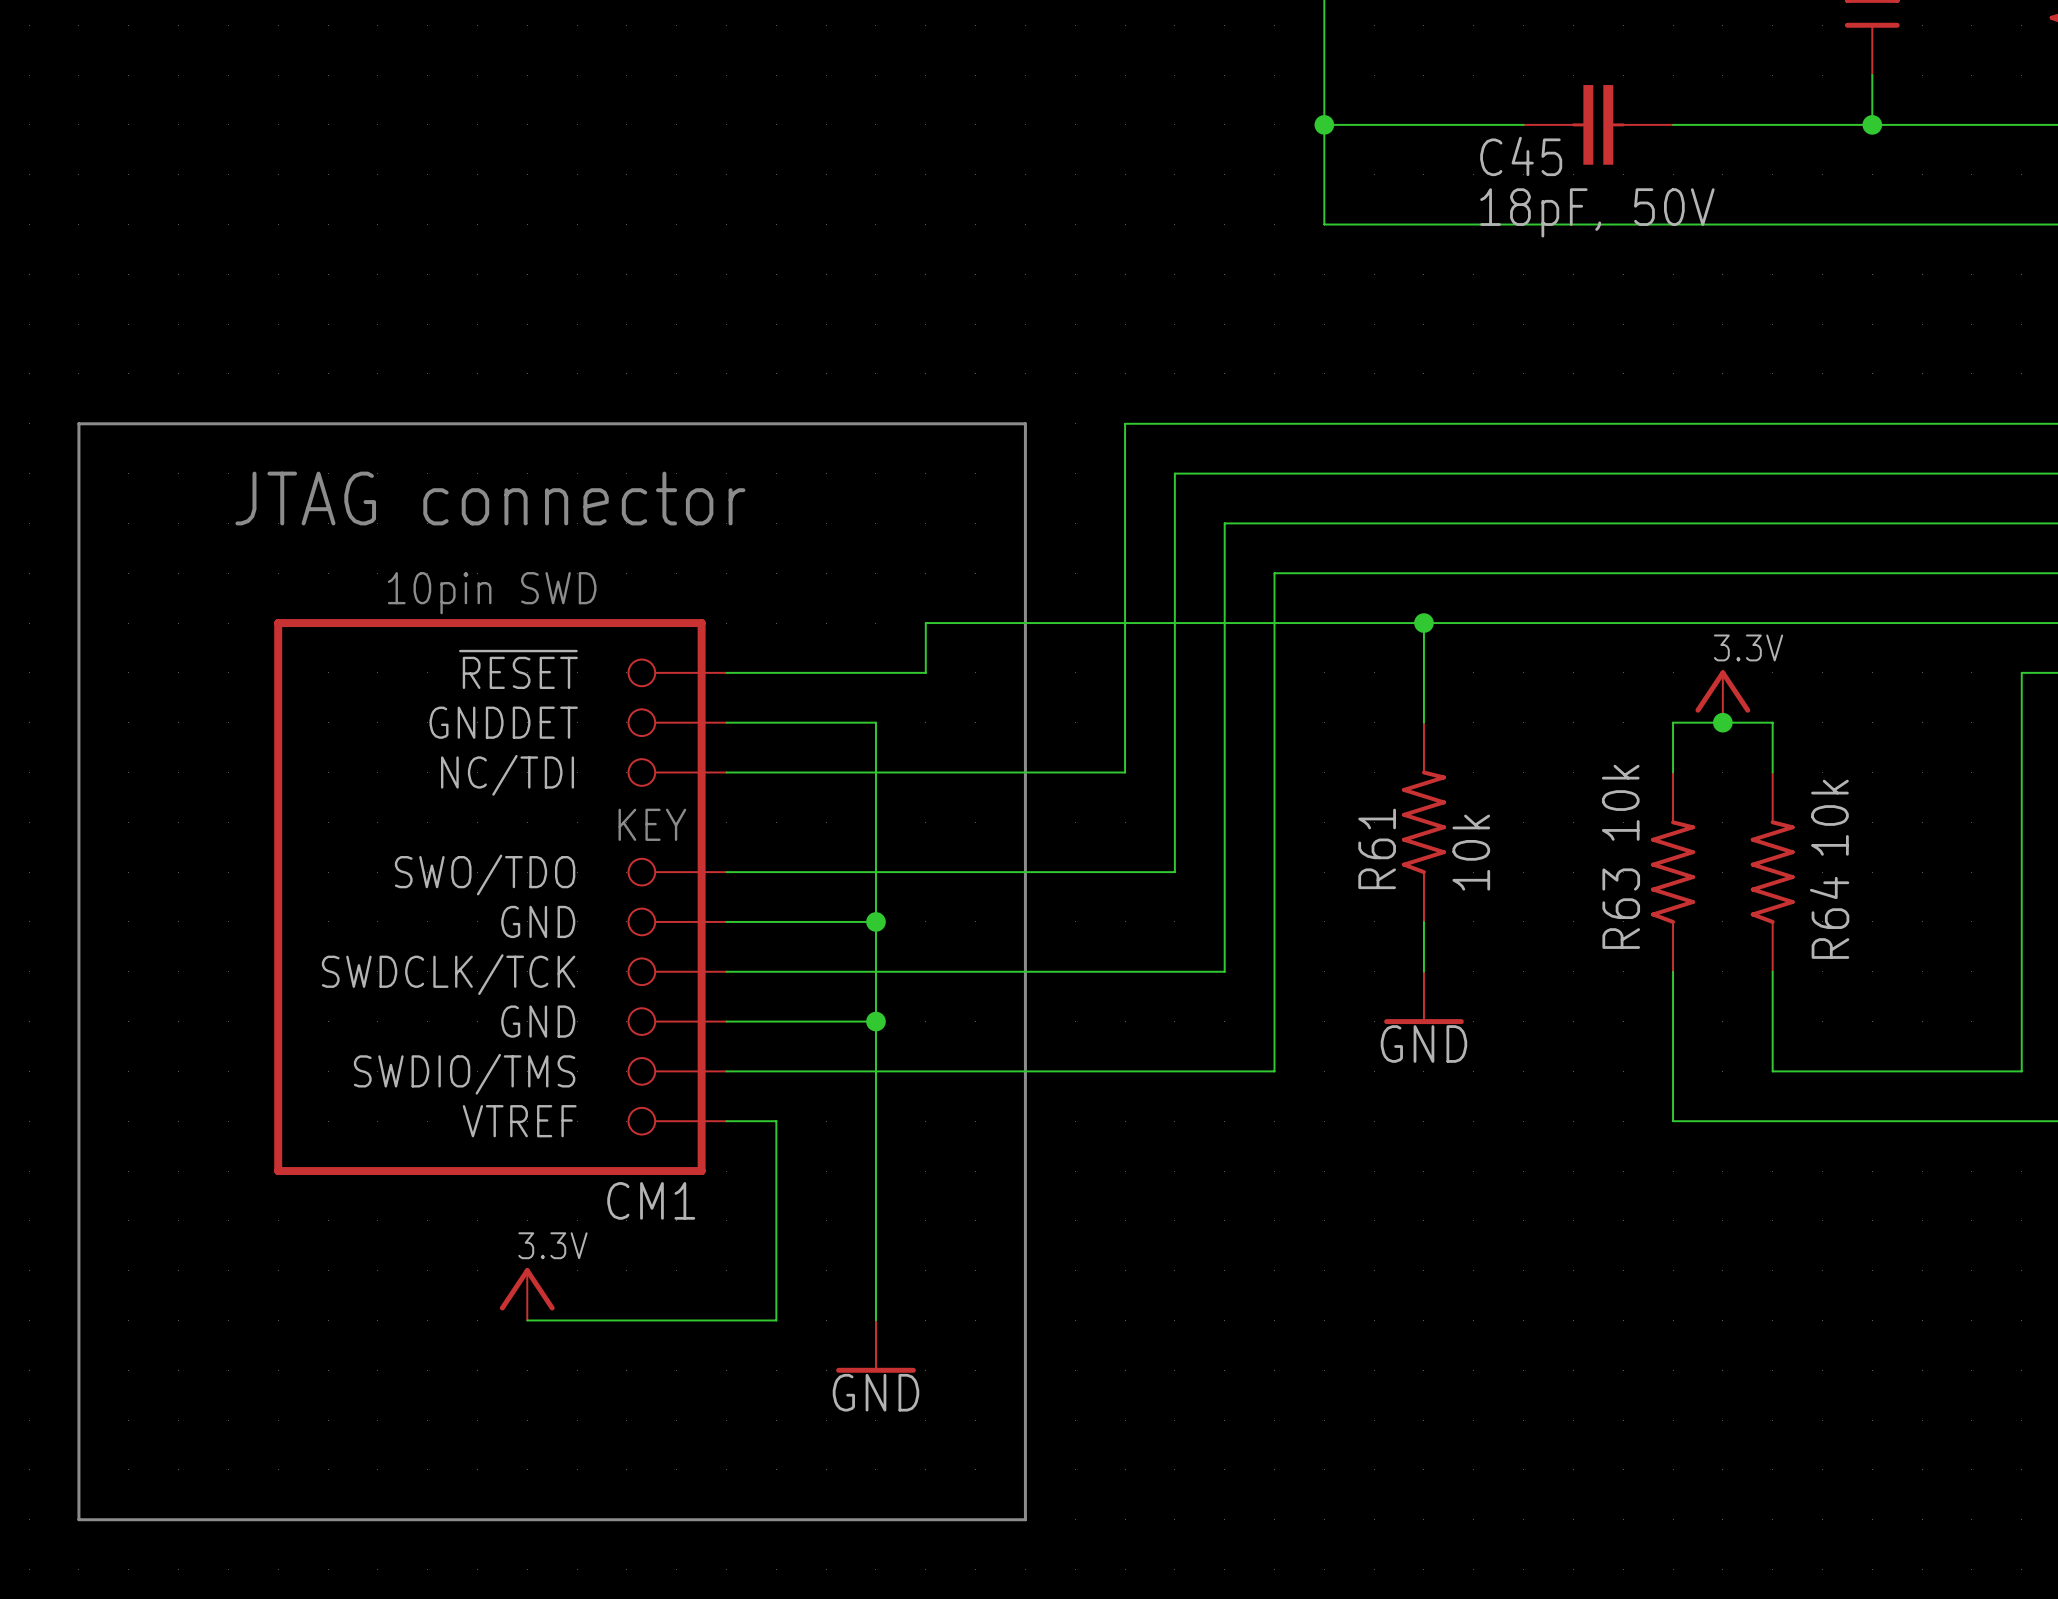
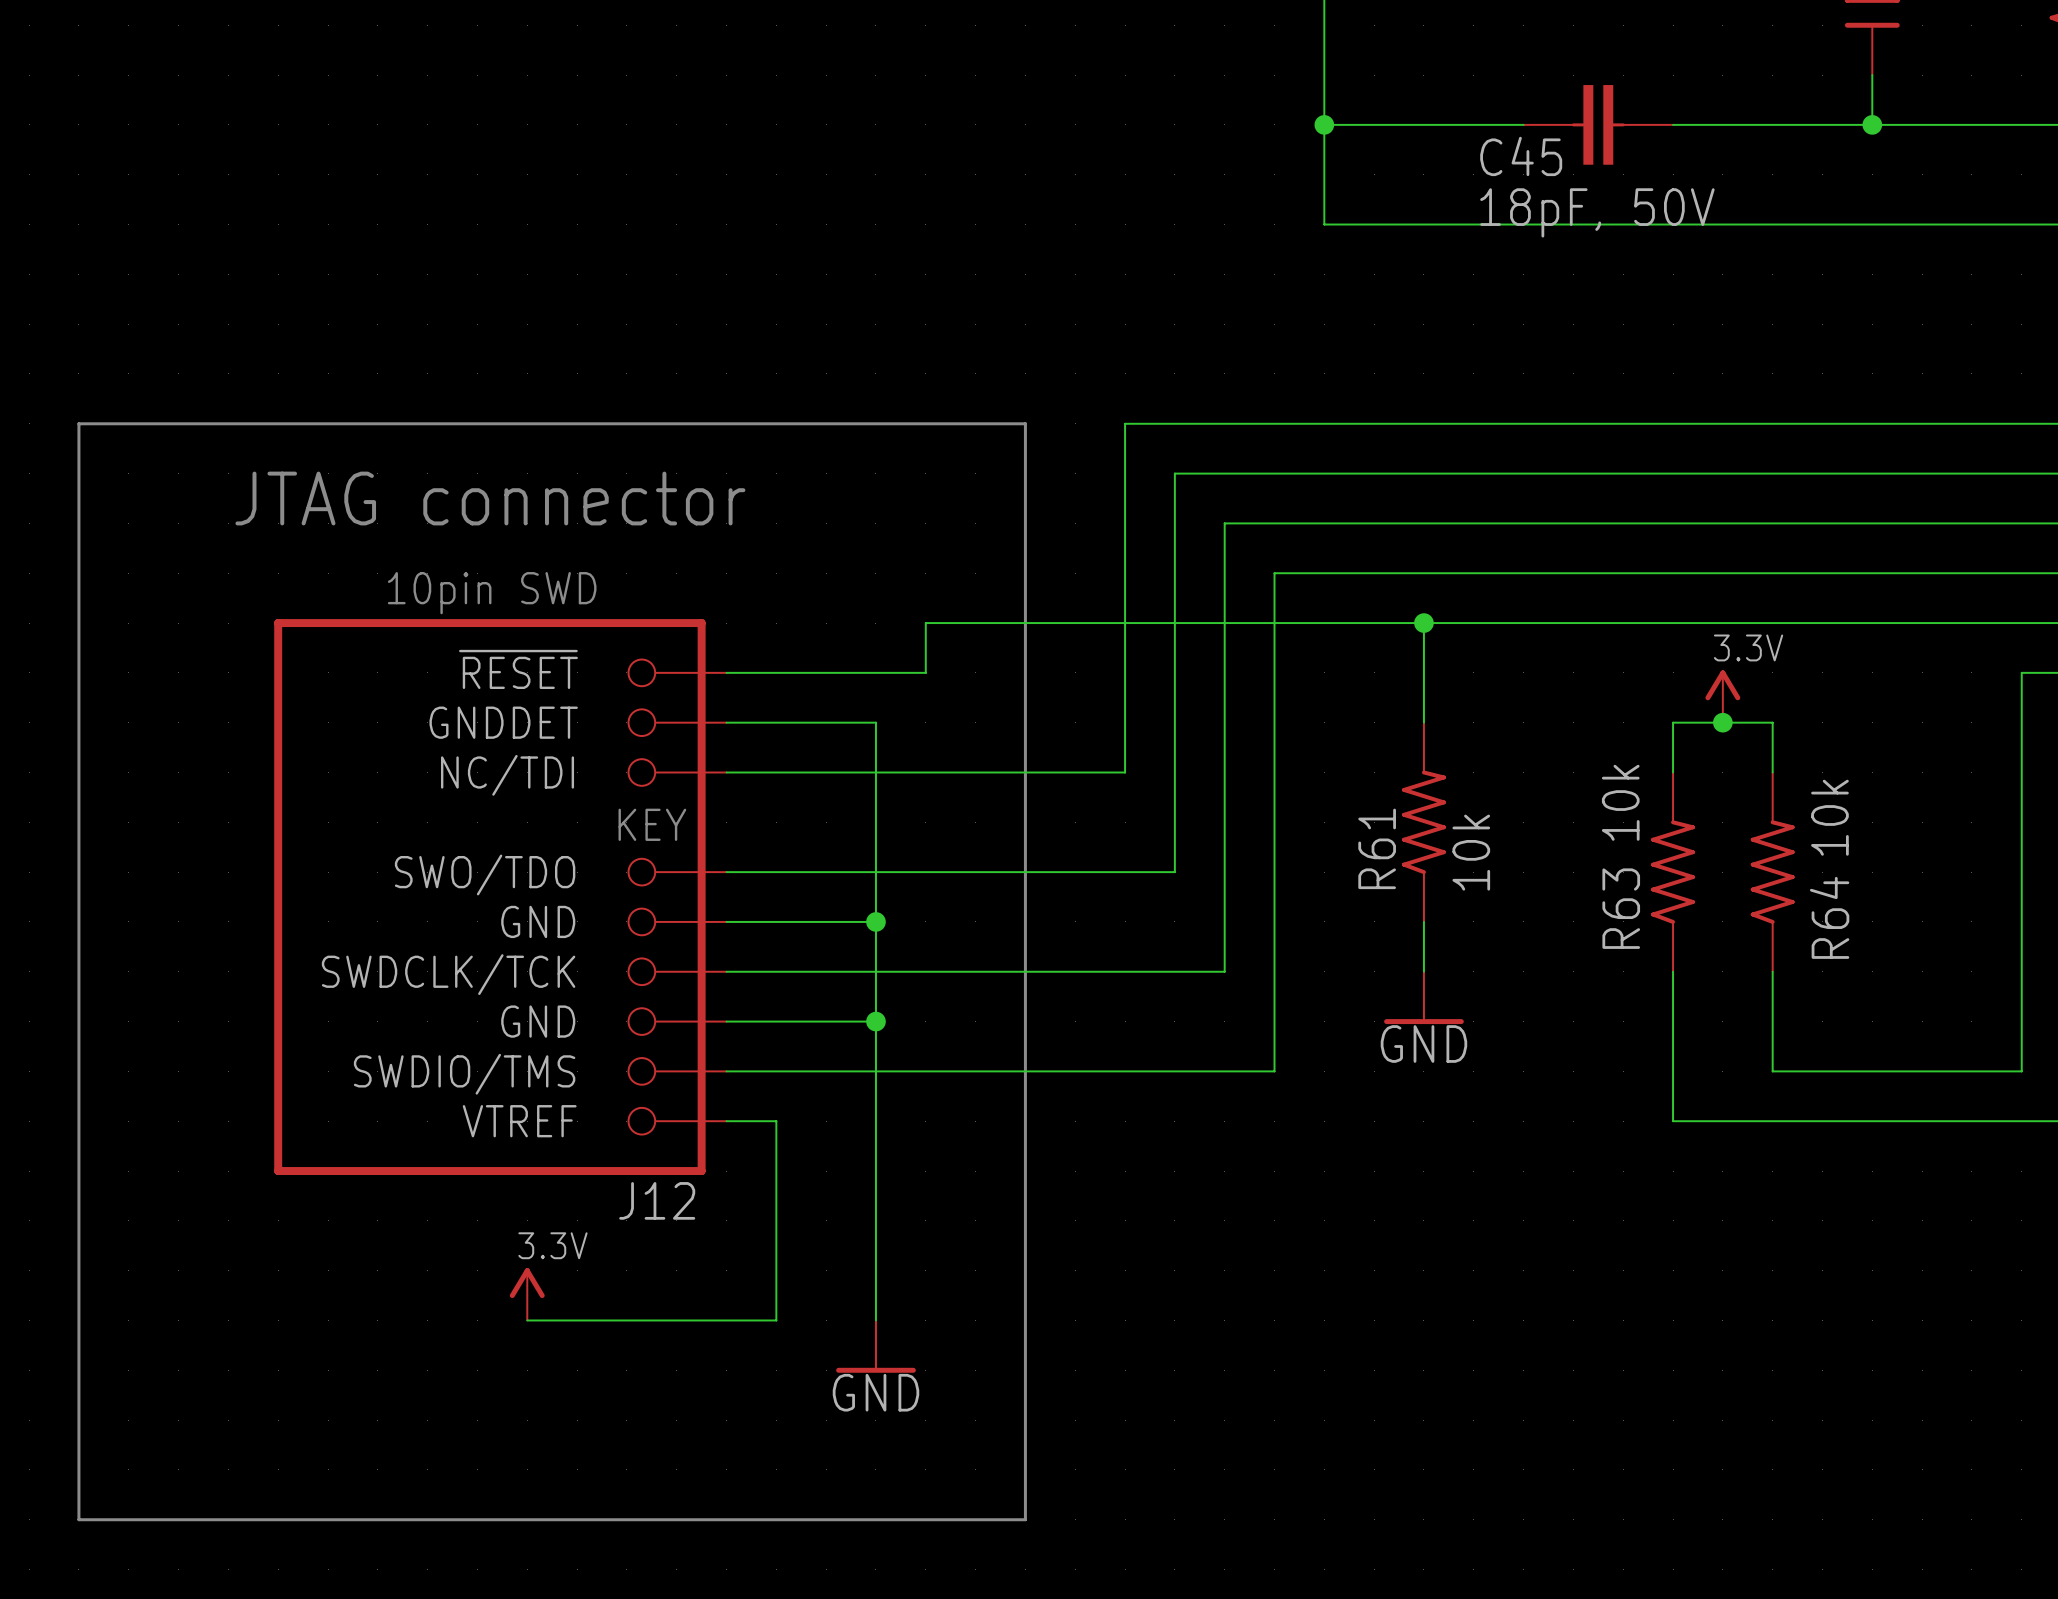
power symbol shape: [1695, 670, 1751, 723] -> [1705, 670, 1741, 723]
CM1 name: CM1 (651, 1200) -> J12 (657, 1200)
power symbol shape: [499, 1268, 555, 1321] -> [509, 1268, 545, 1321]

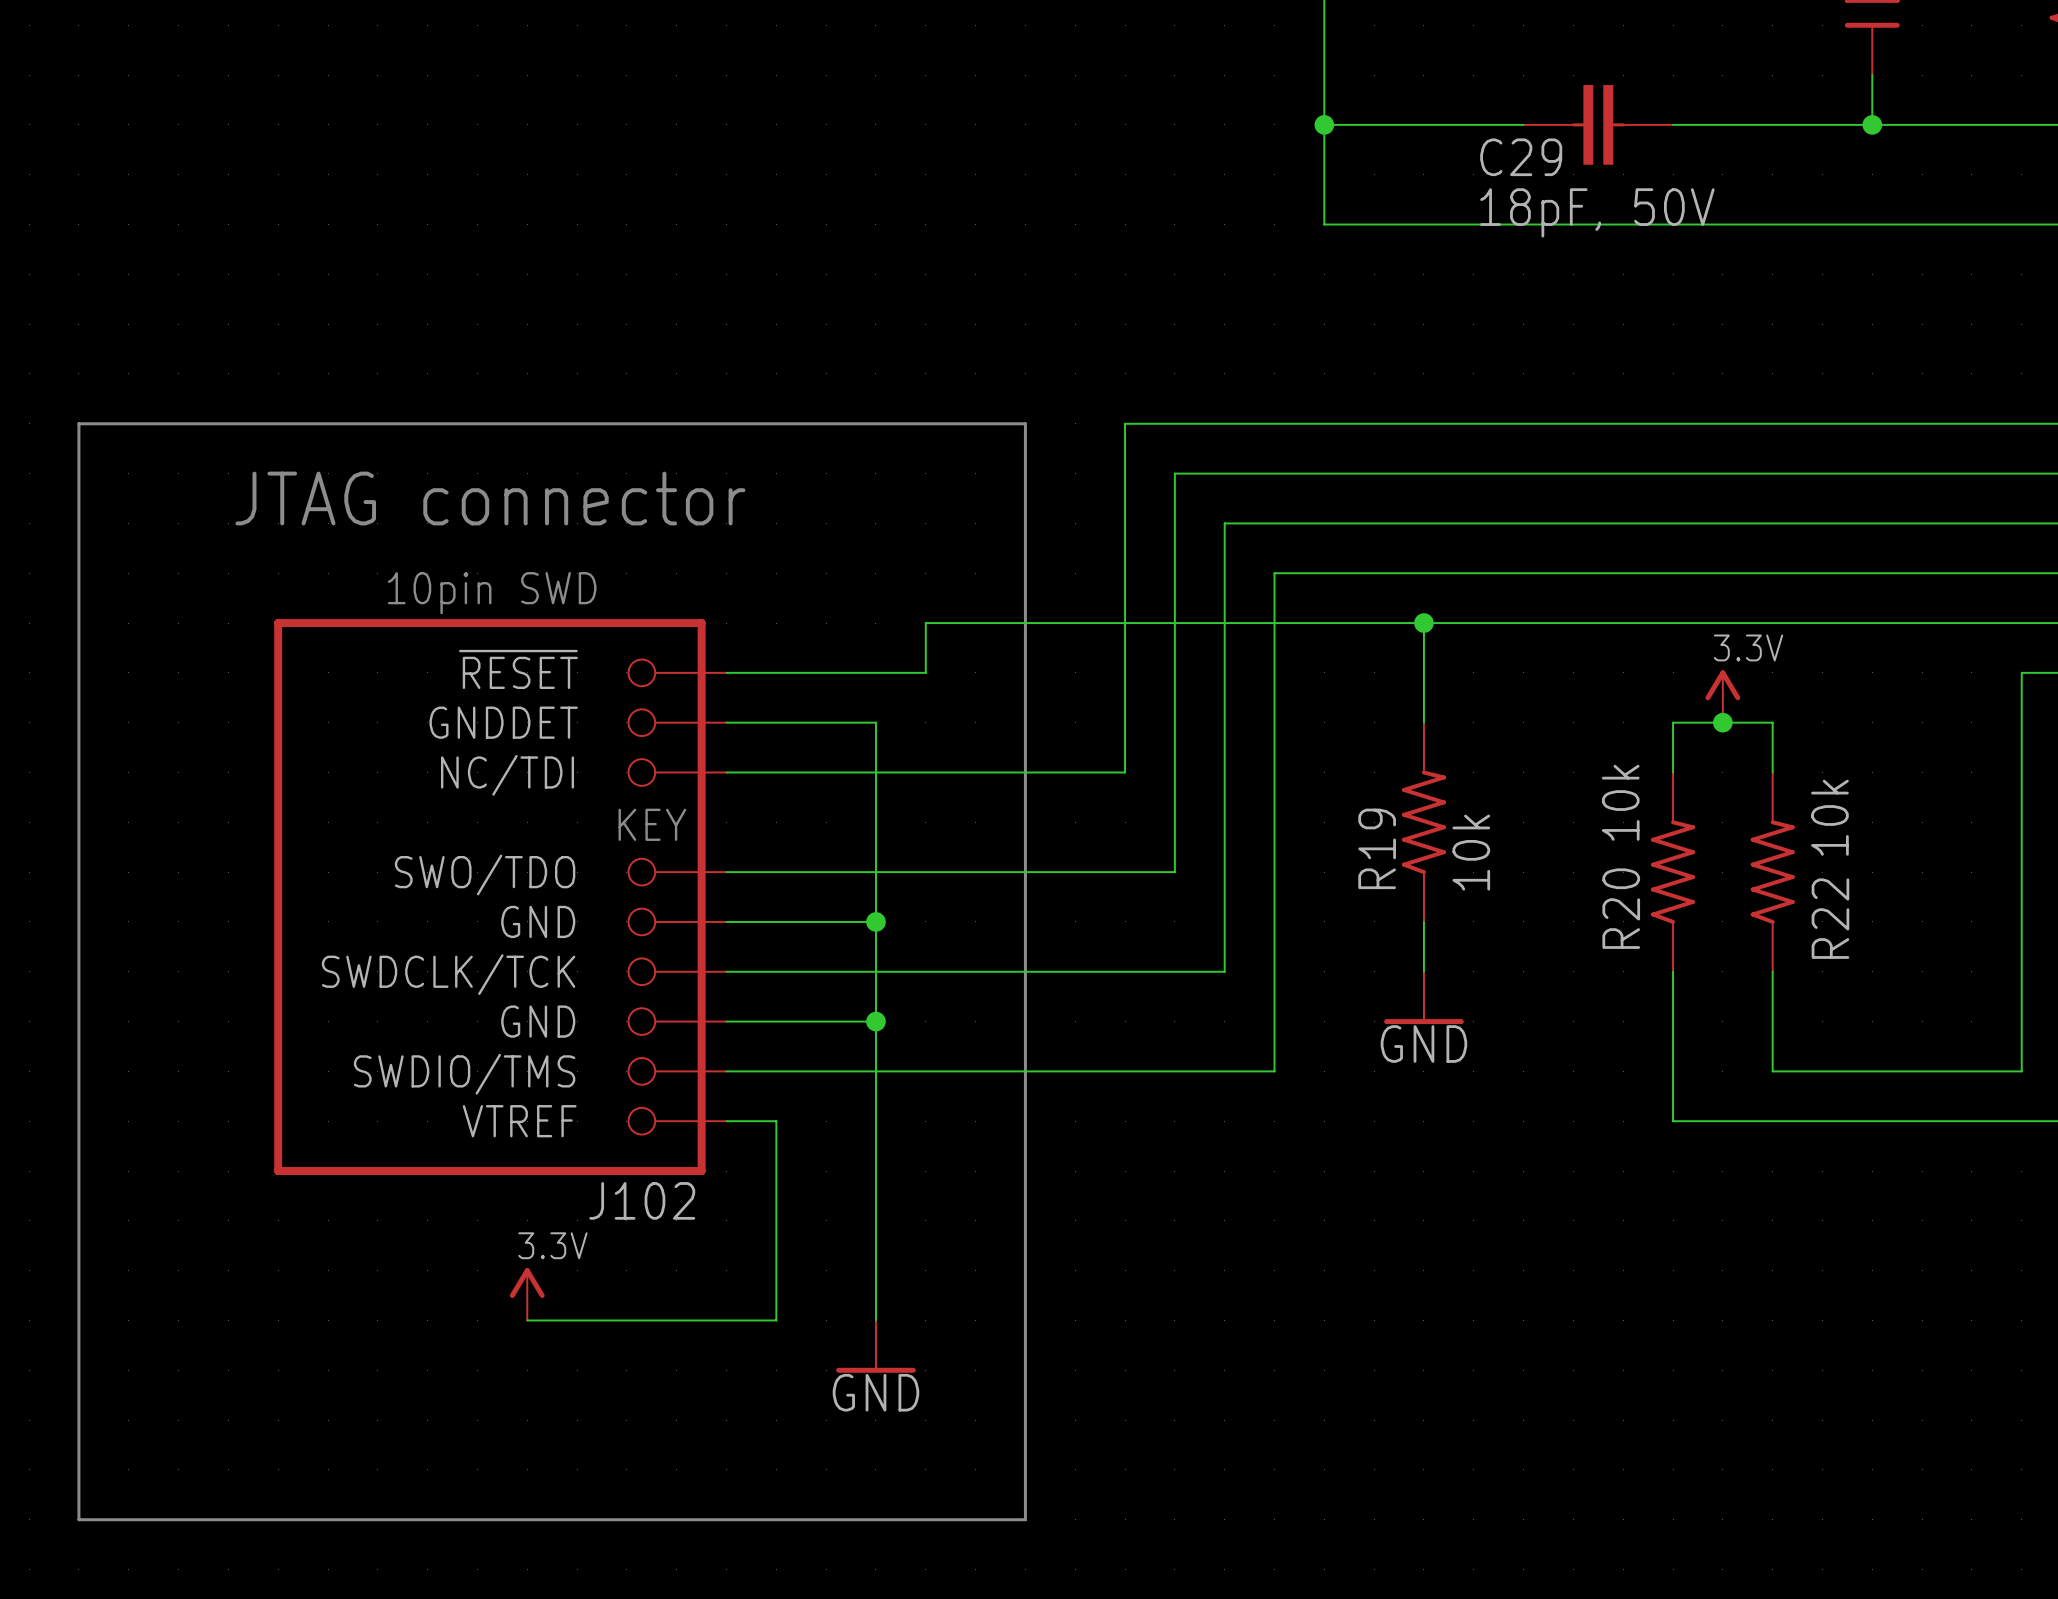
C45 name: C45 (1521, 156) -> C29 (1521, 157)
R61 name: R61 (1377, 848) -> R19 (1377, 848)
R63 name: R63 (1621, 908) -> R20 (1621, 908)
R64 name: R64 (1829, 917) -> R22 (1830, 918)
J12 name: J12 (657, 1200) -> J102 (642, 1200)

